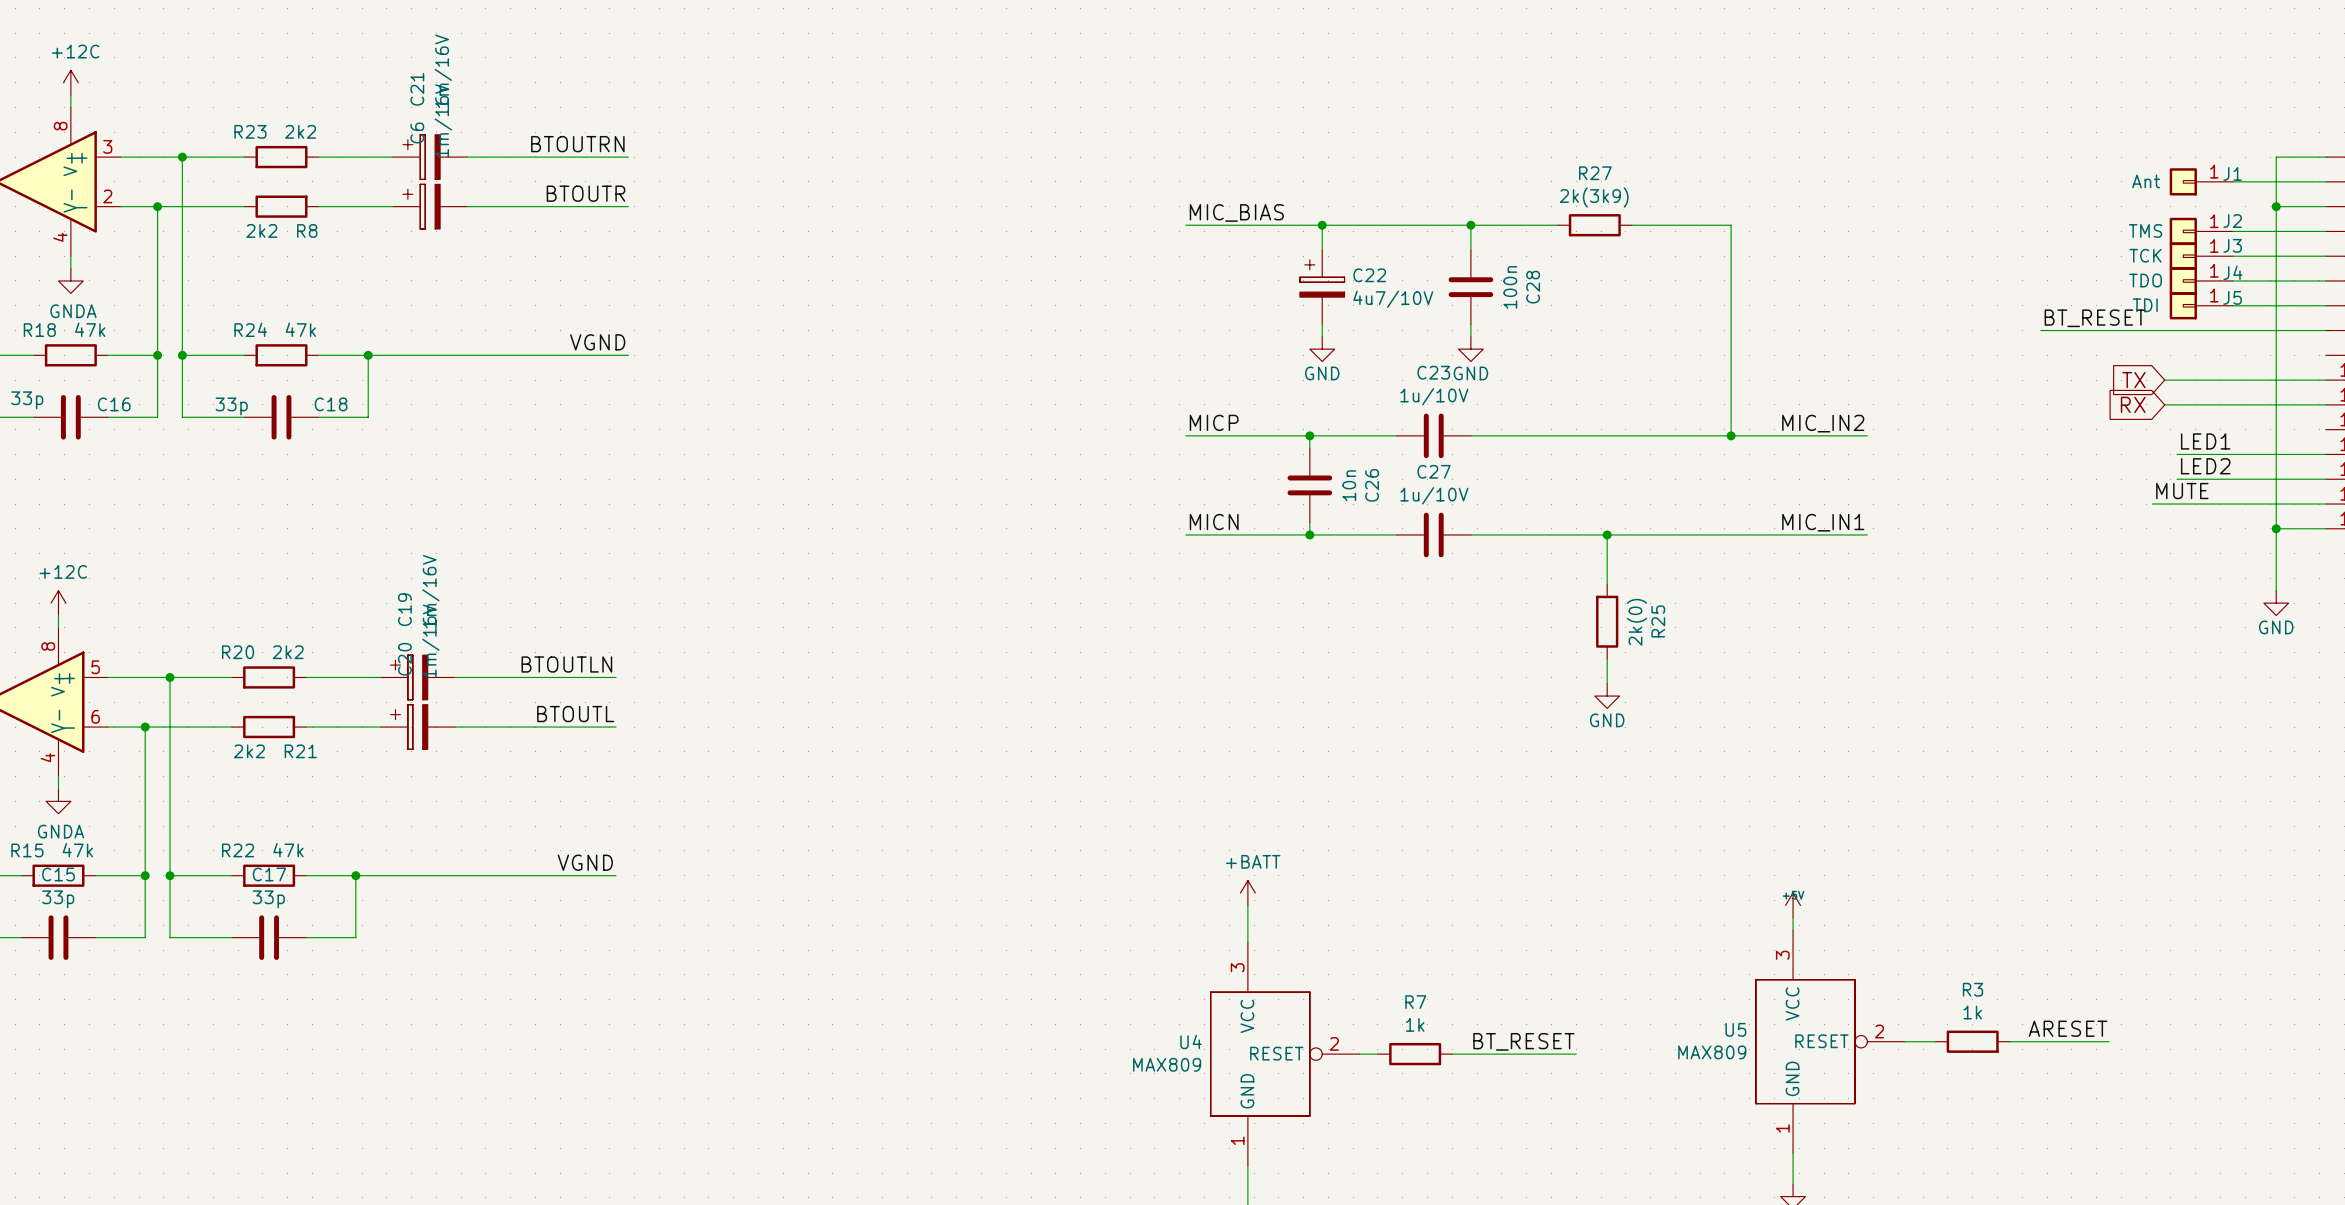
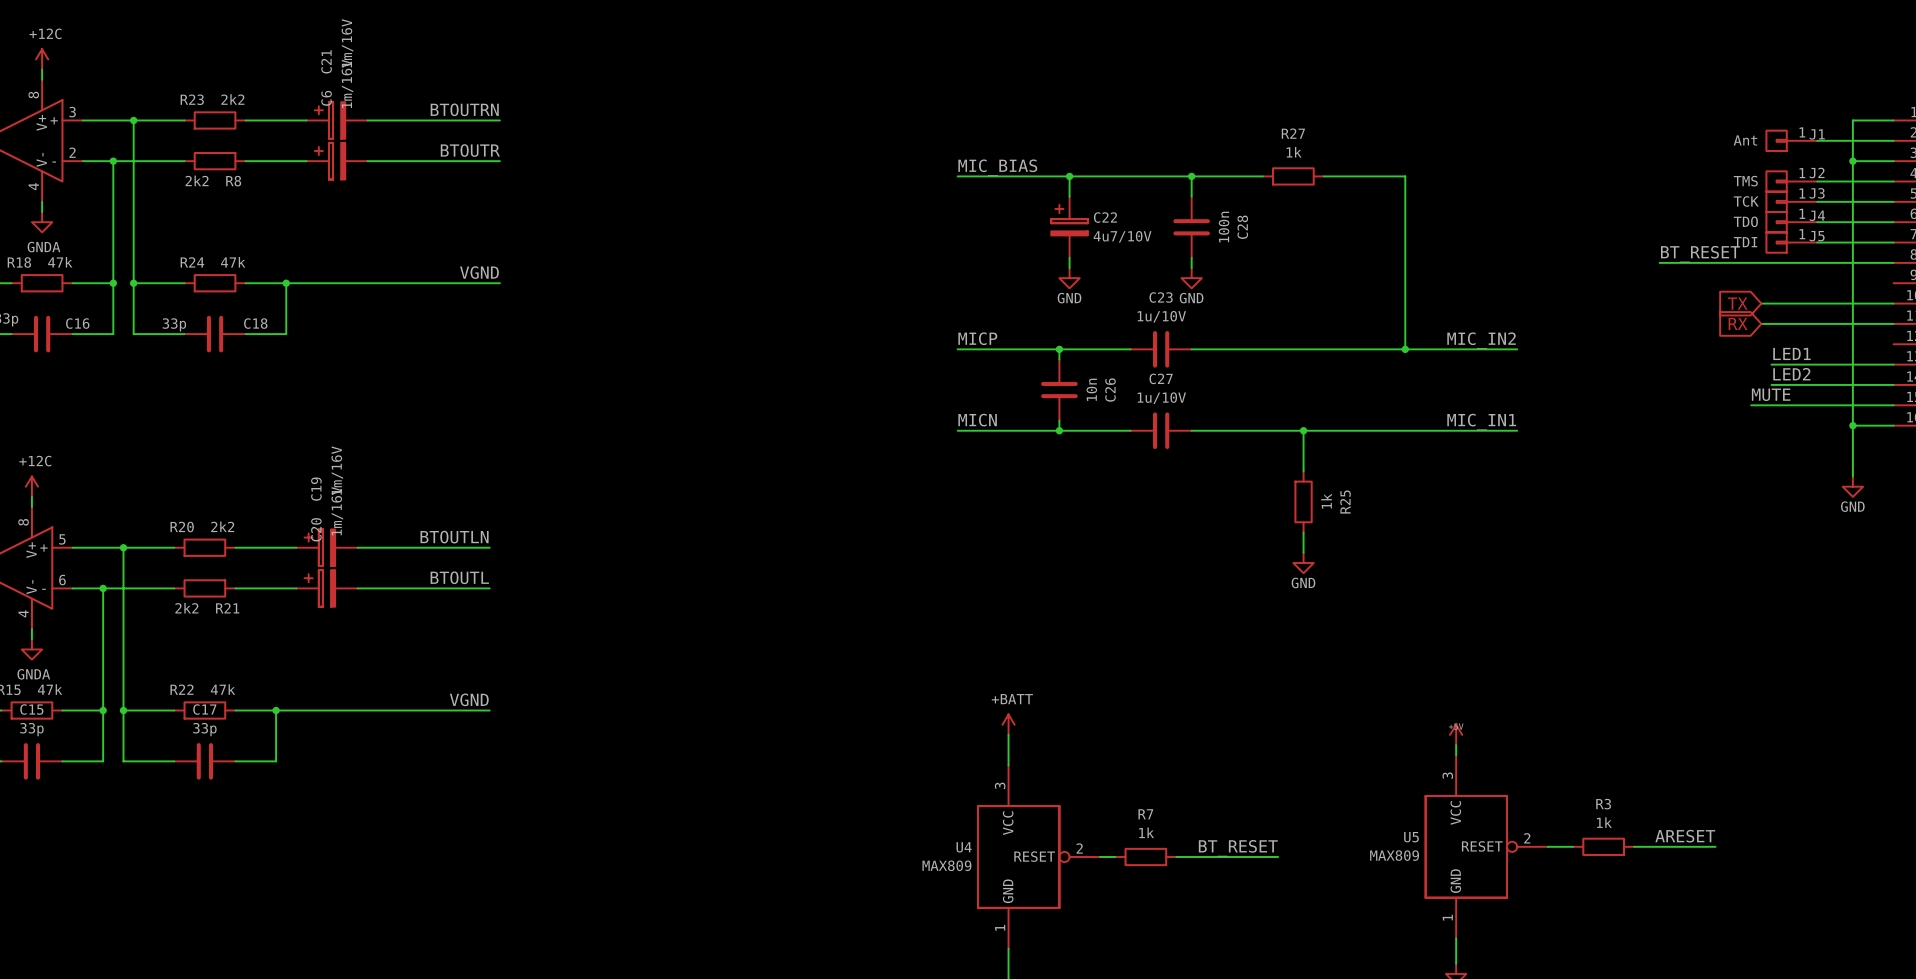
R27 value: 2k(3k9) (1594, 197) -> 1k (1294, 152)
R25 value: 2k(0) (1636, 622) -> 1k (1326, 501)

